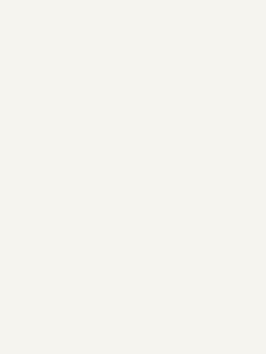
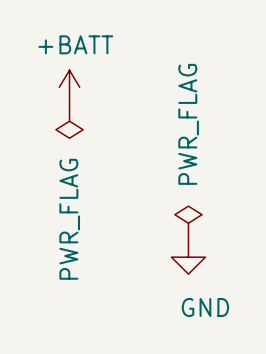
power symbol: none -> +BATT (69, 87)
power symbol: none -> PWR_FLAG (69, 121)
power symbol: none -> PWR_FLAG (188, 223)
power symbol: none -> GND (188, 257)

